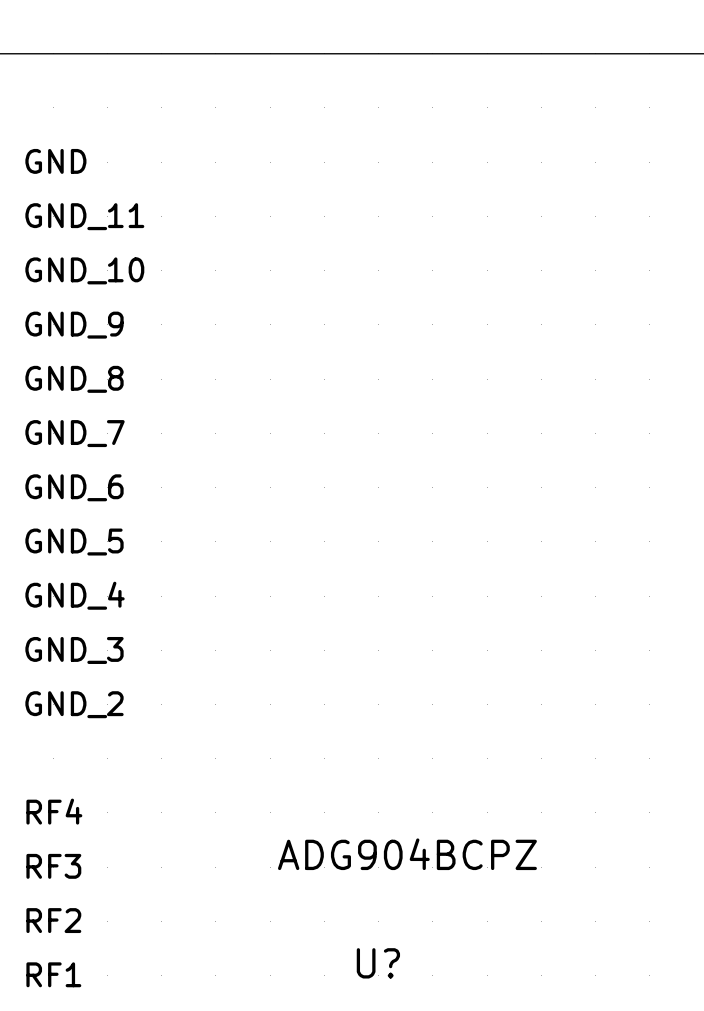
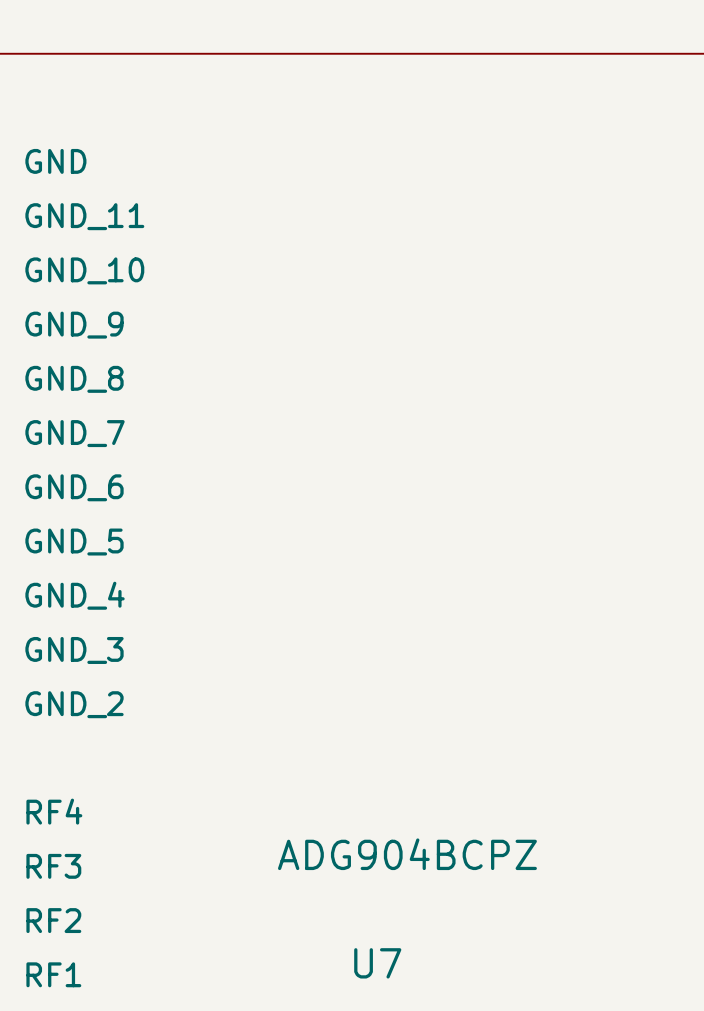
U? name: U? (378, 963) -> U7 (377, 963)

